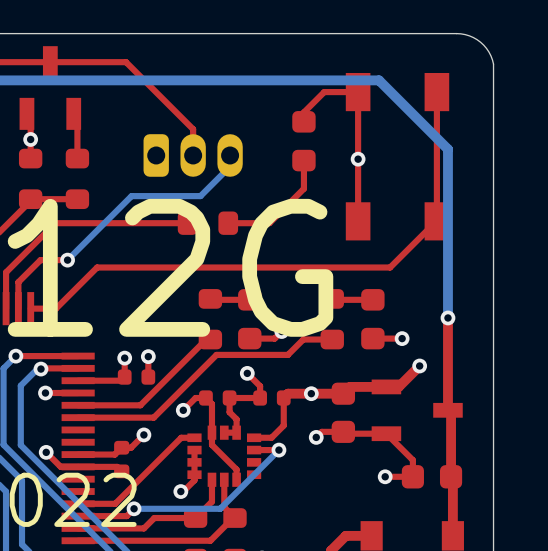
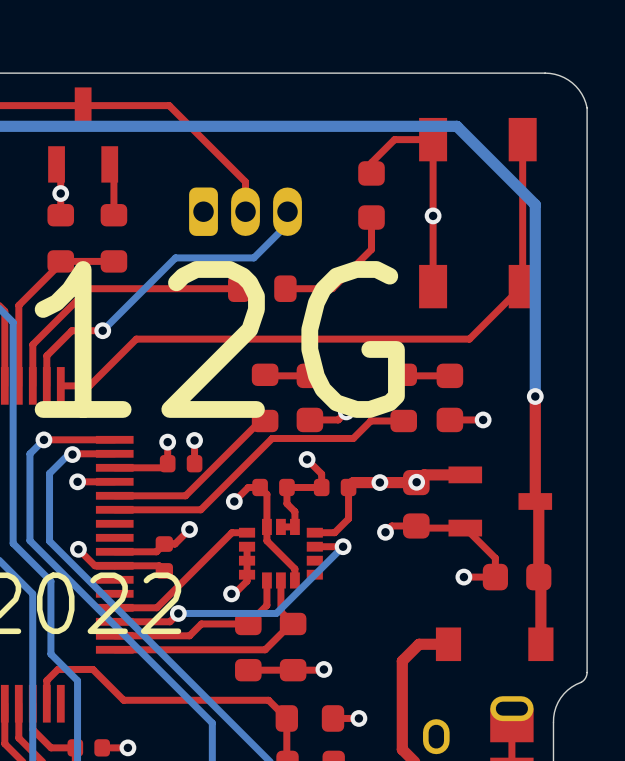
top track: (419, 365) (398, 386) (386, 386) -> none
via position: (419, 365) -> (416, 482)

